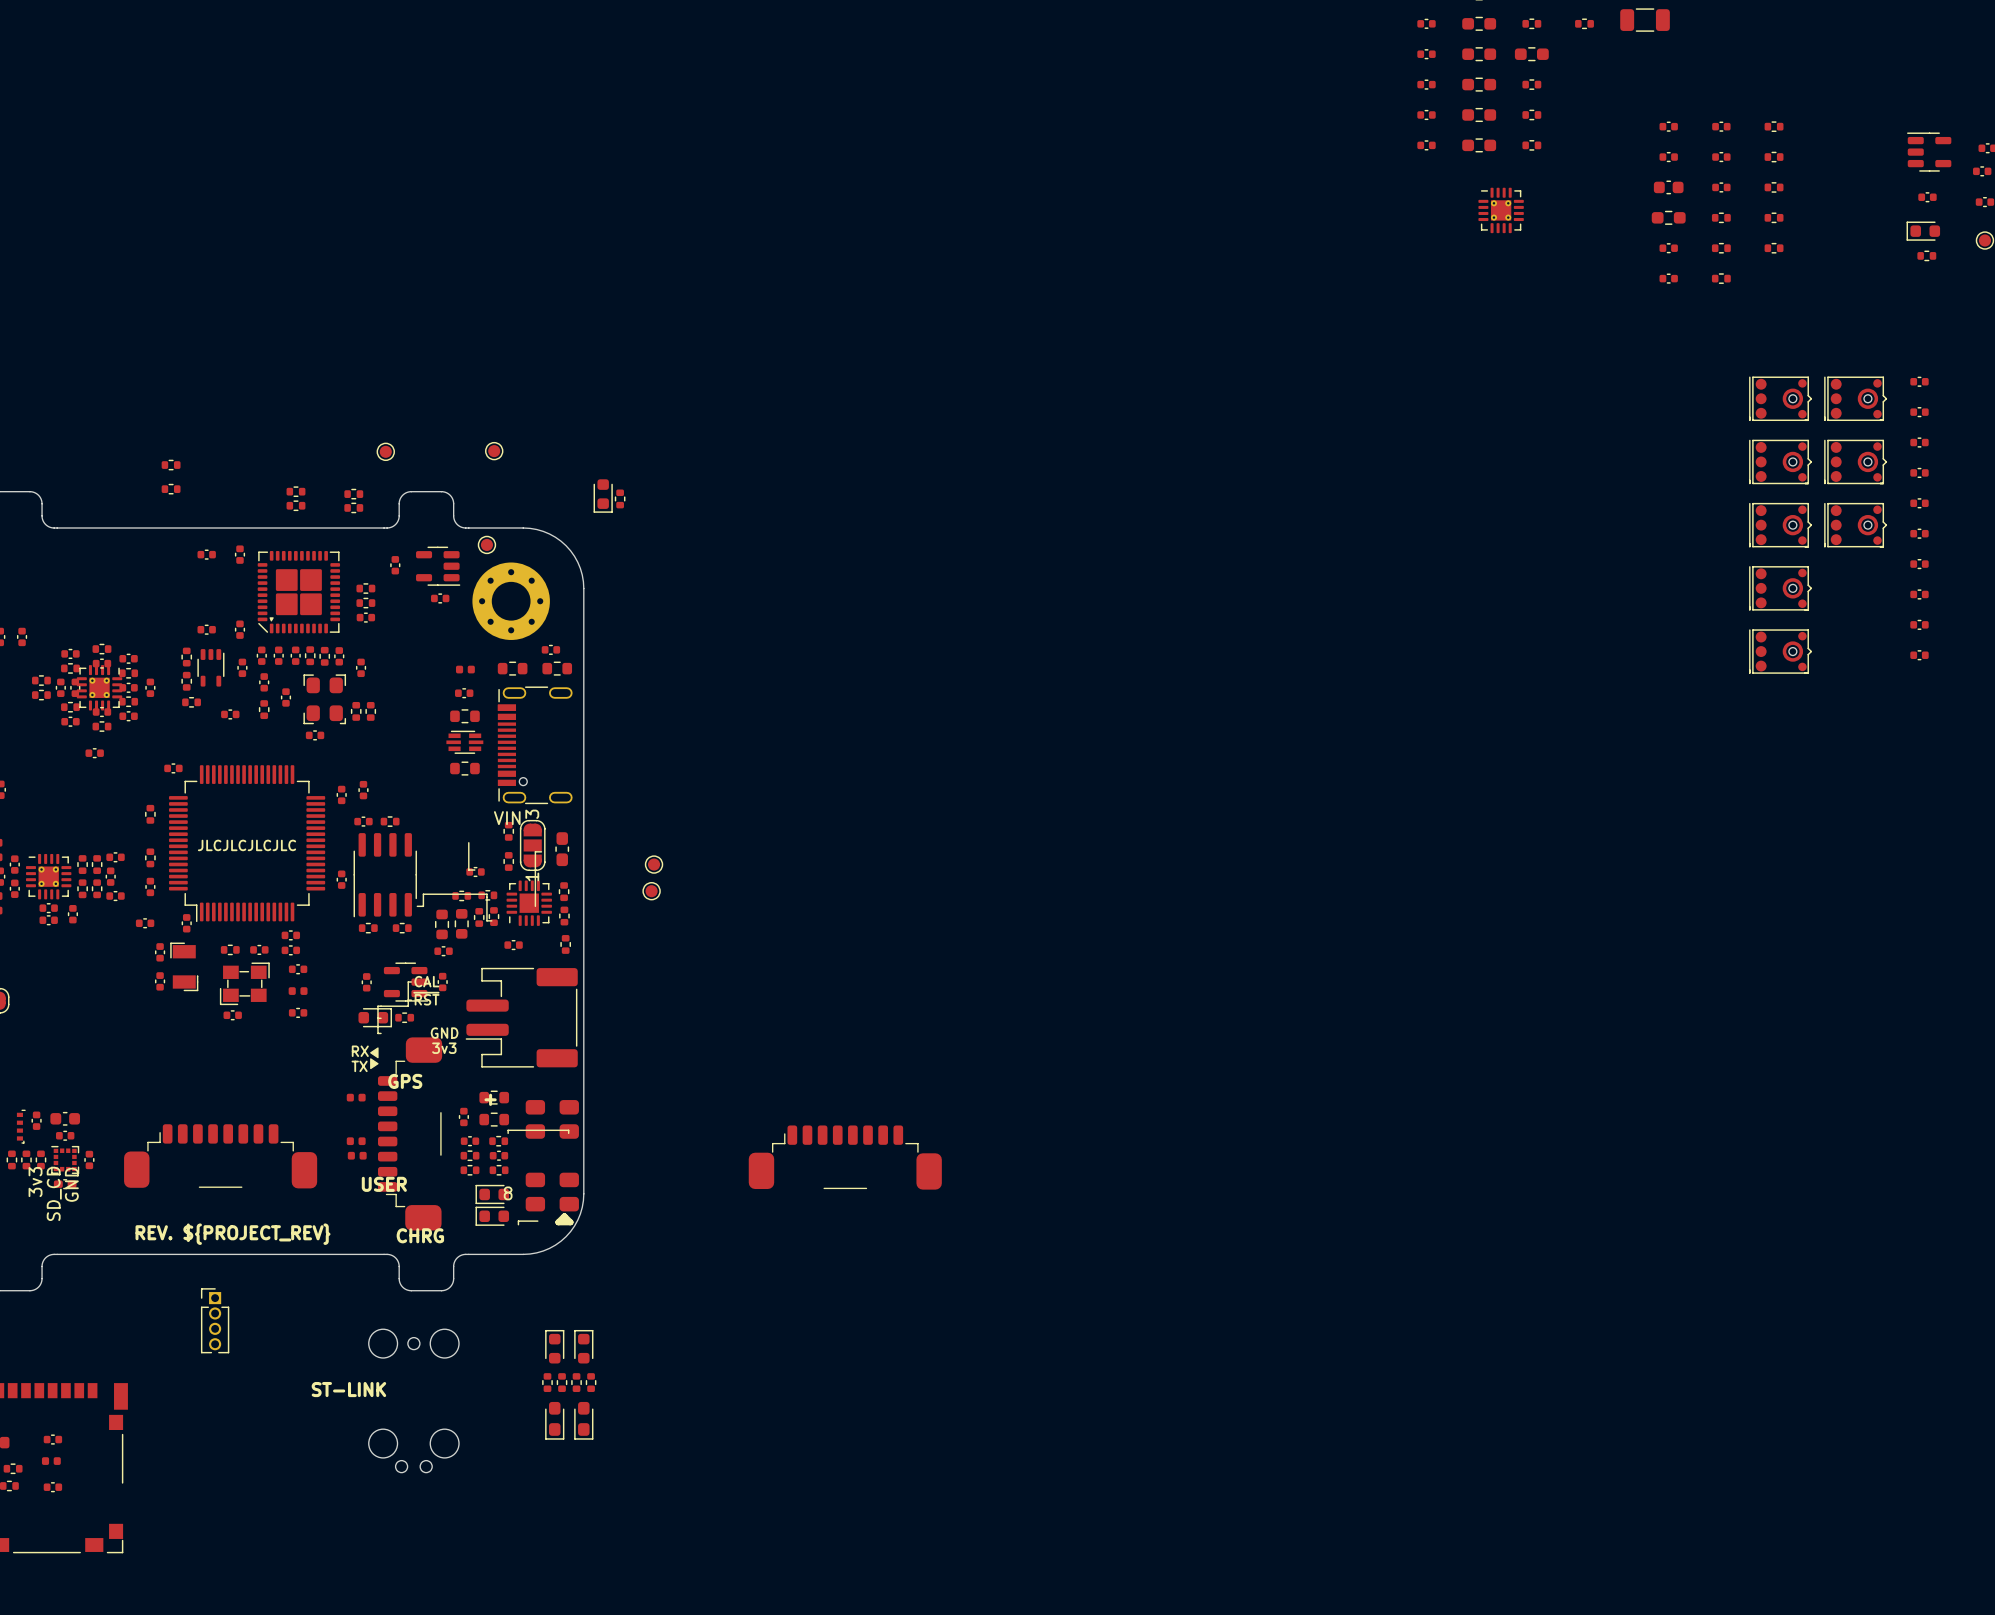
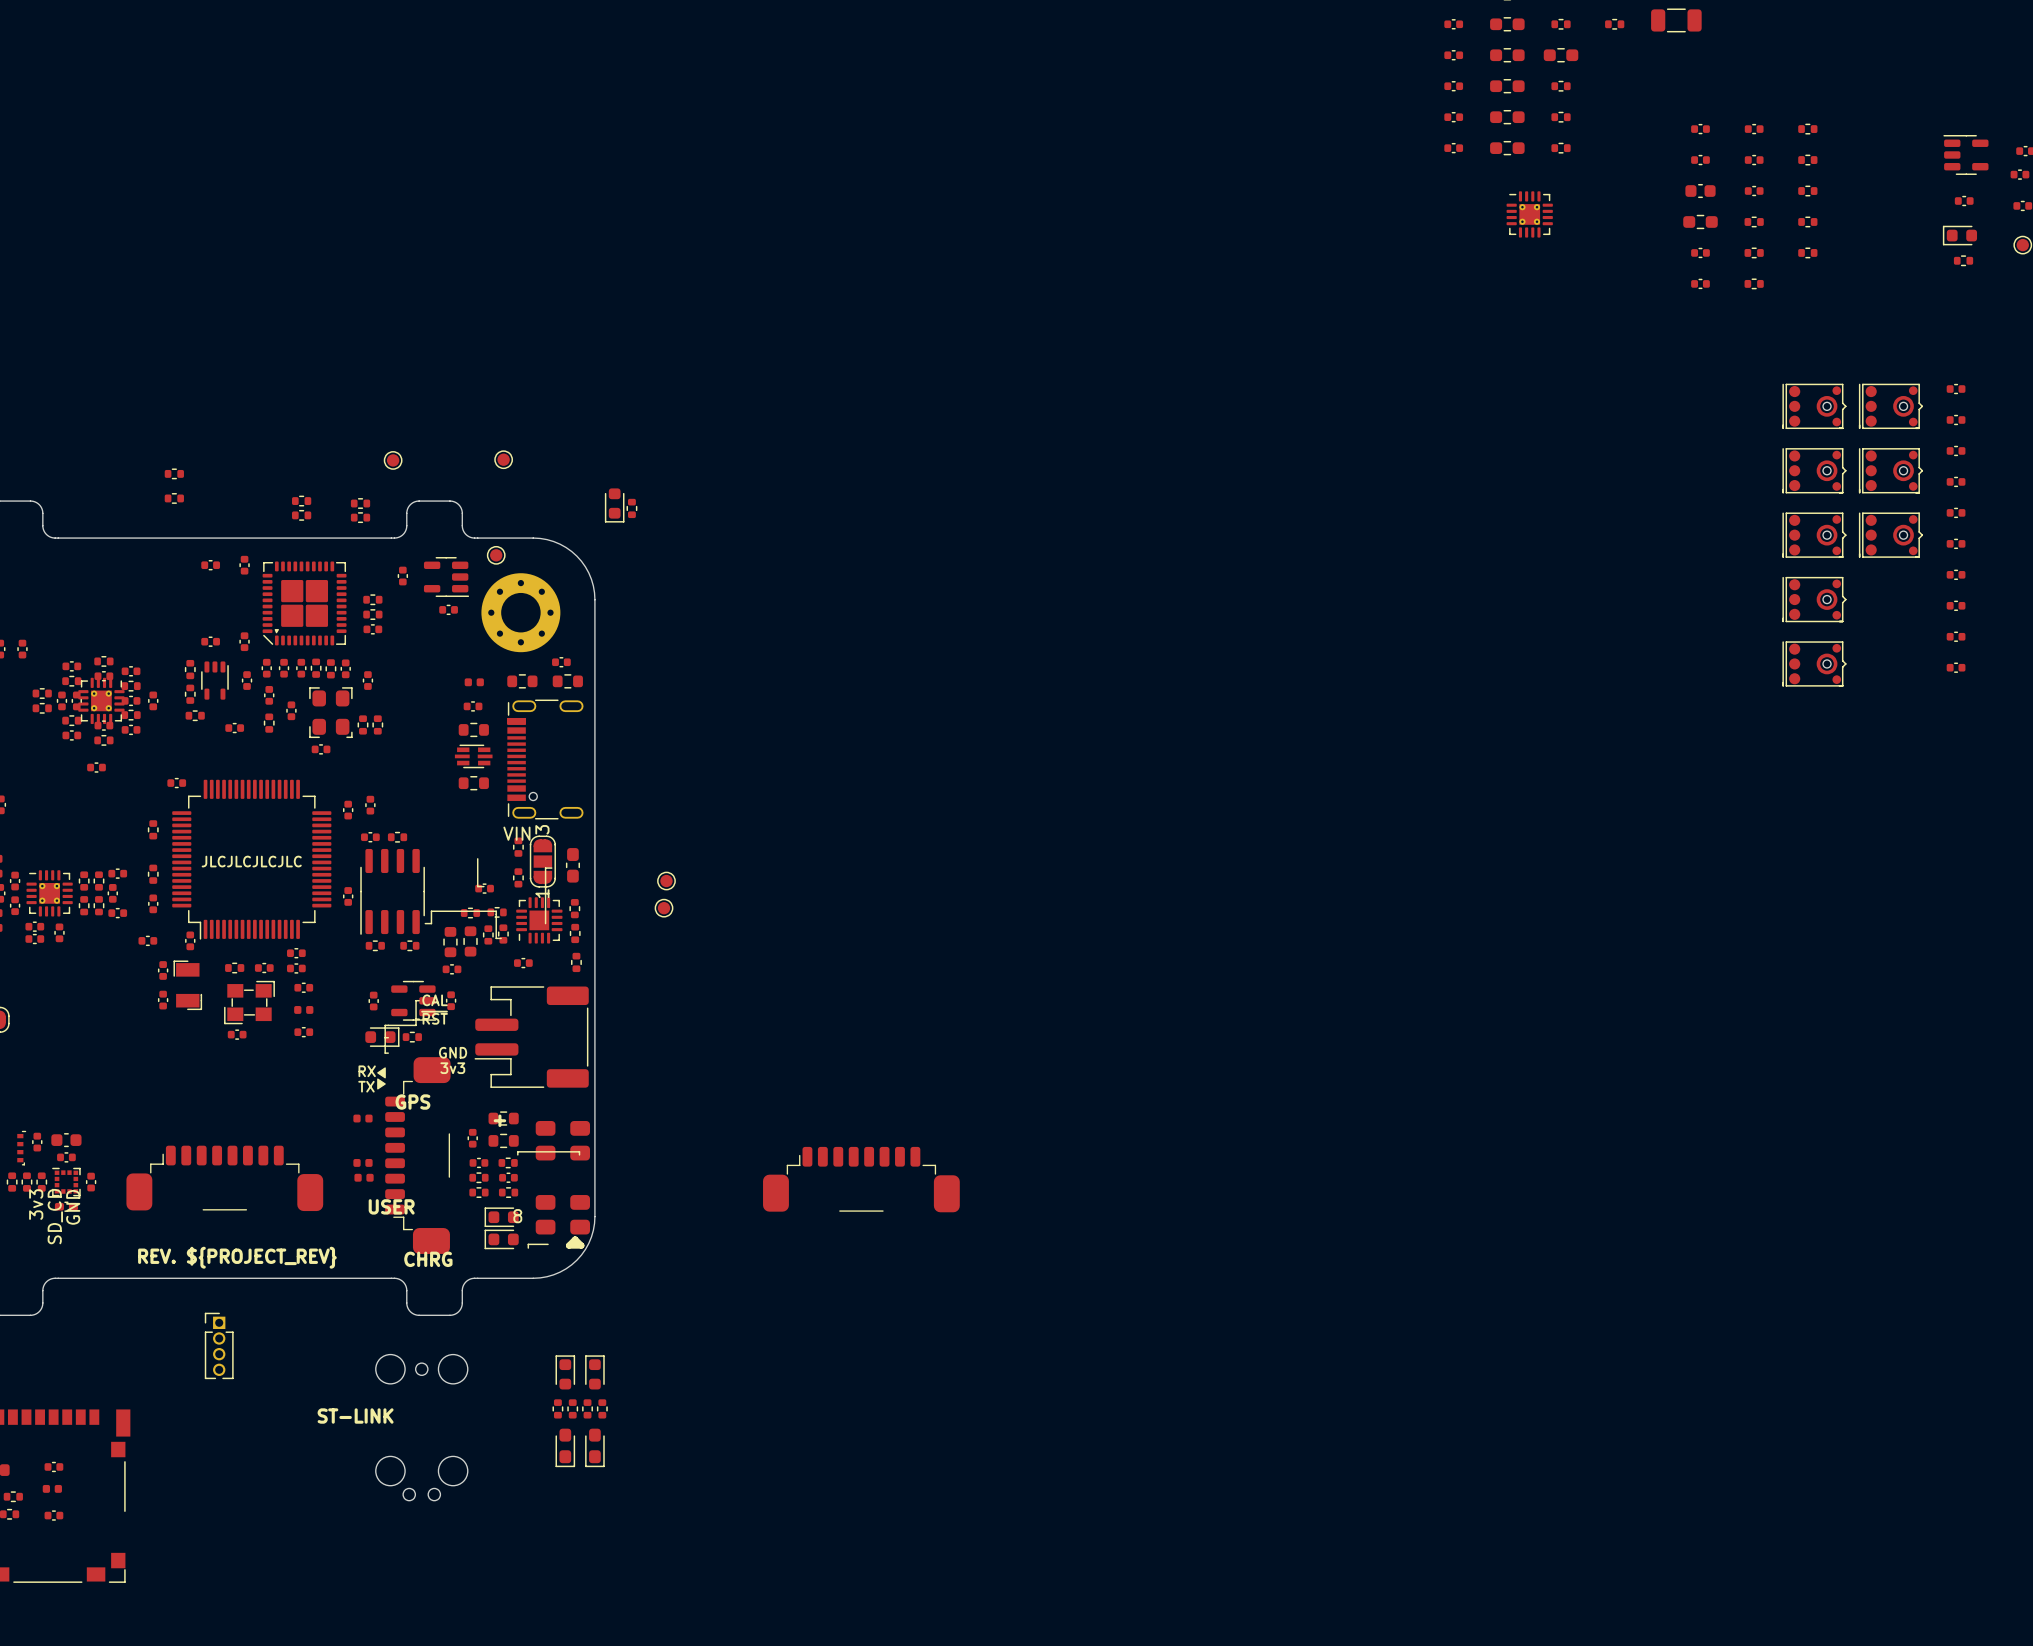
part: (48, 908) -> none
part: none -> (34, 926)
part: (72, 914) -> none
part: none -> (59, 932)
part: (48, 920) -> none
part: none -> (34, 939)

